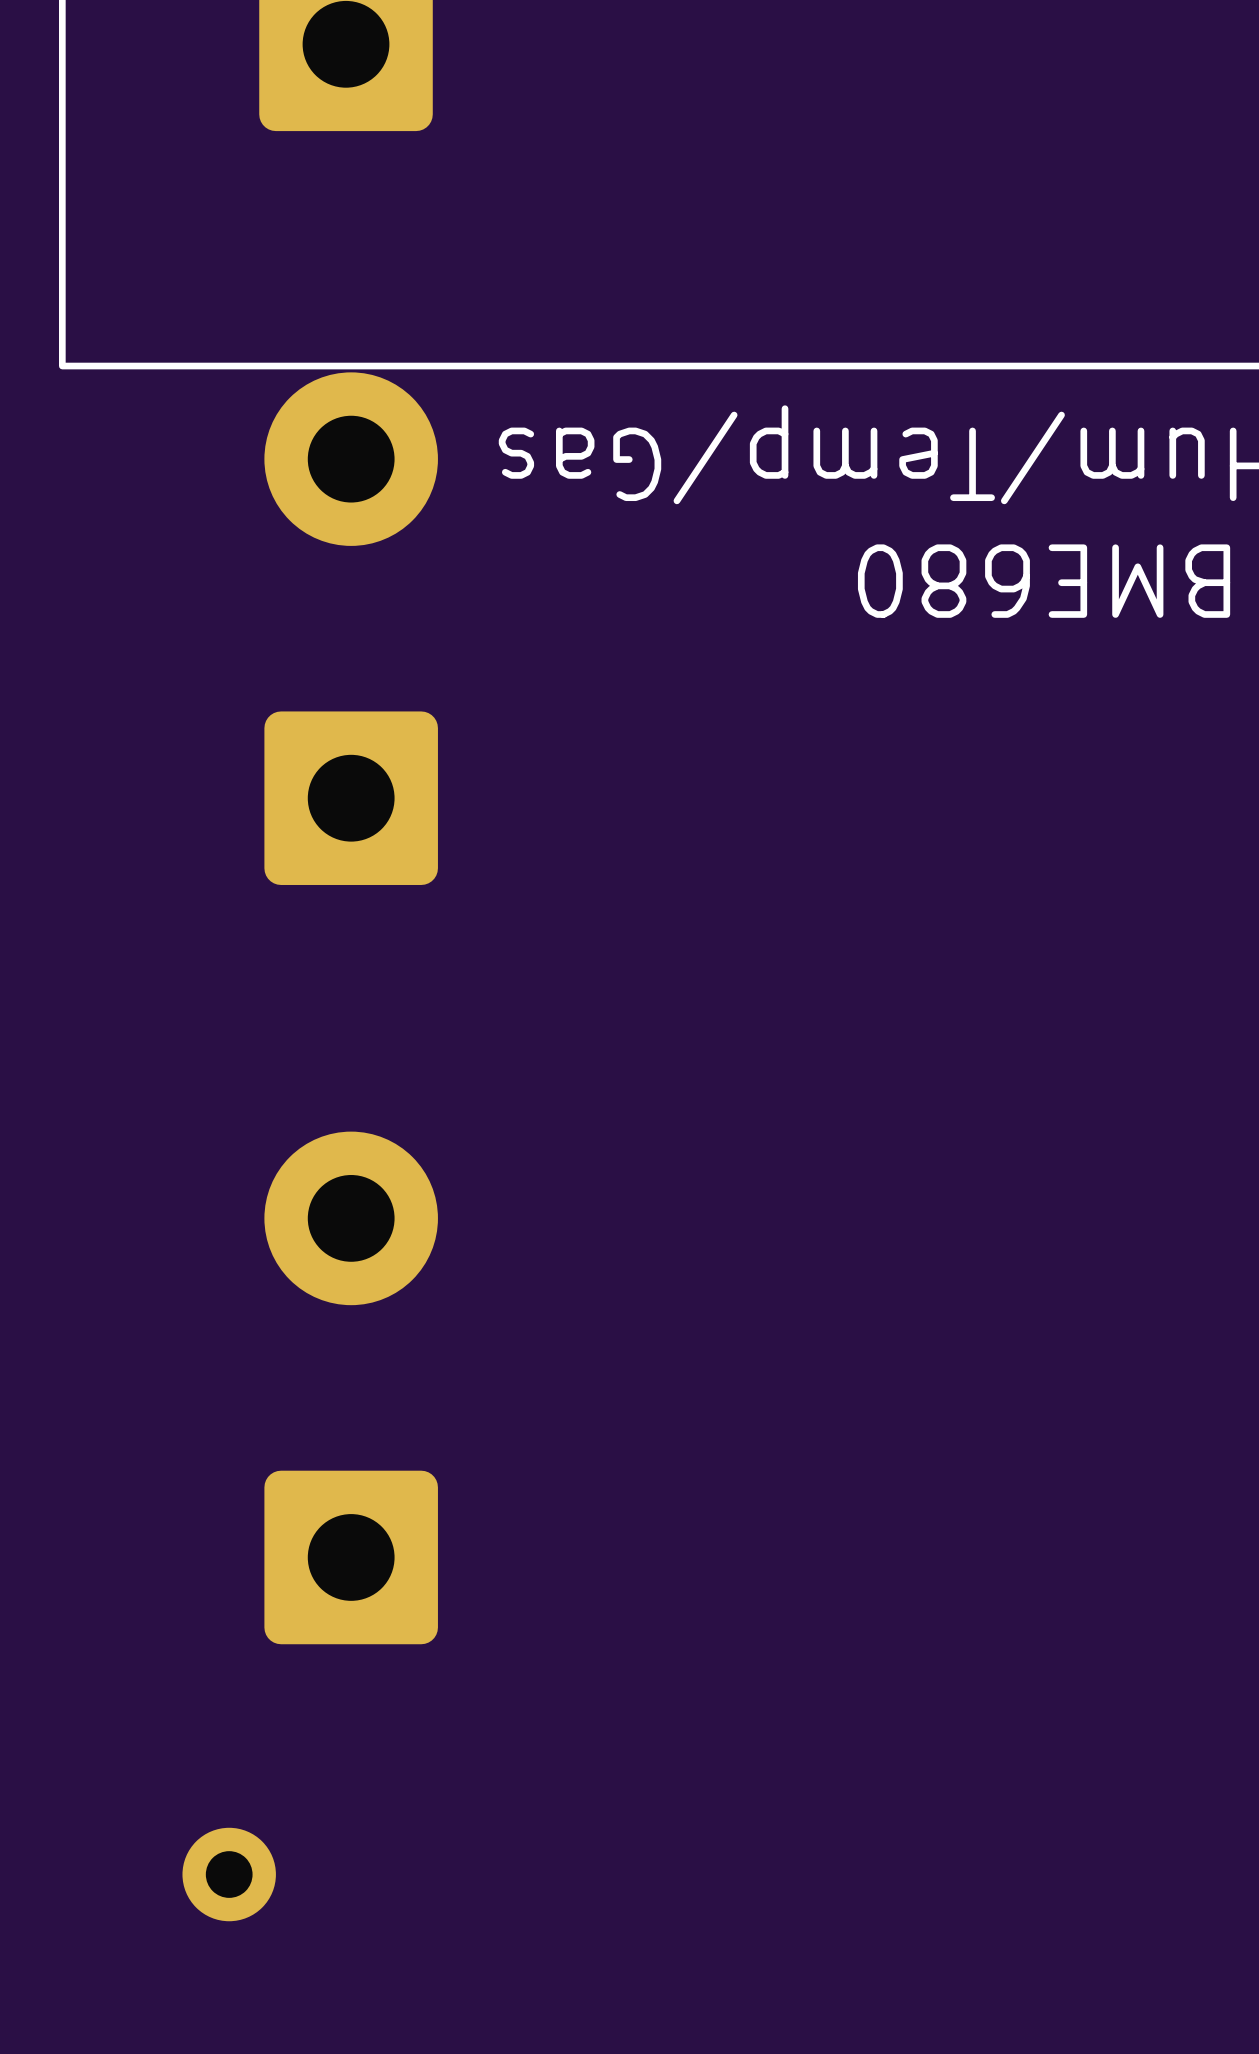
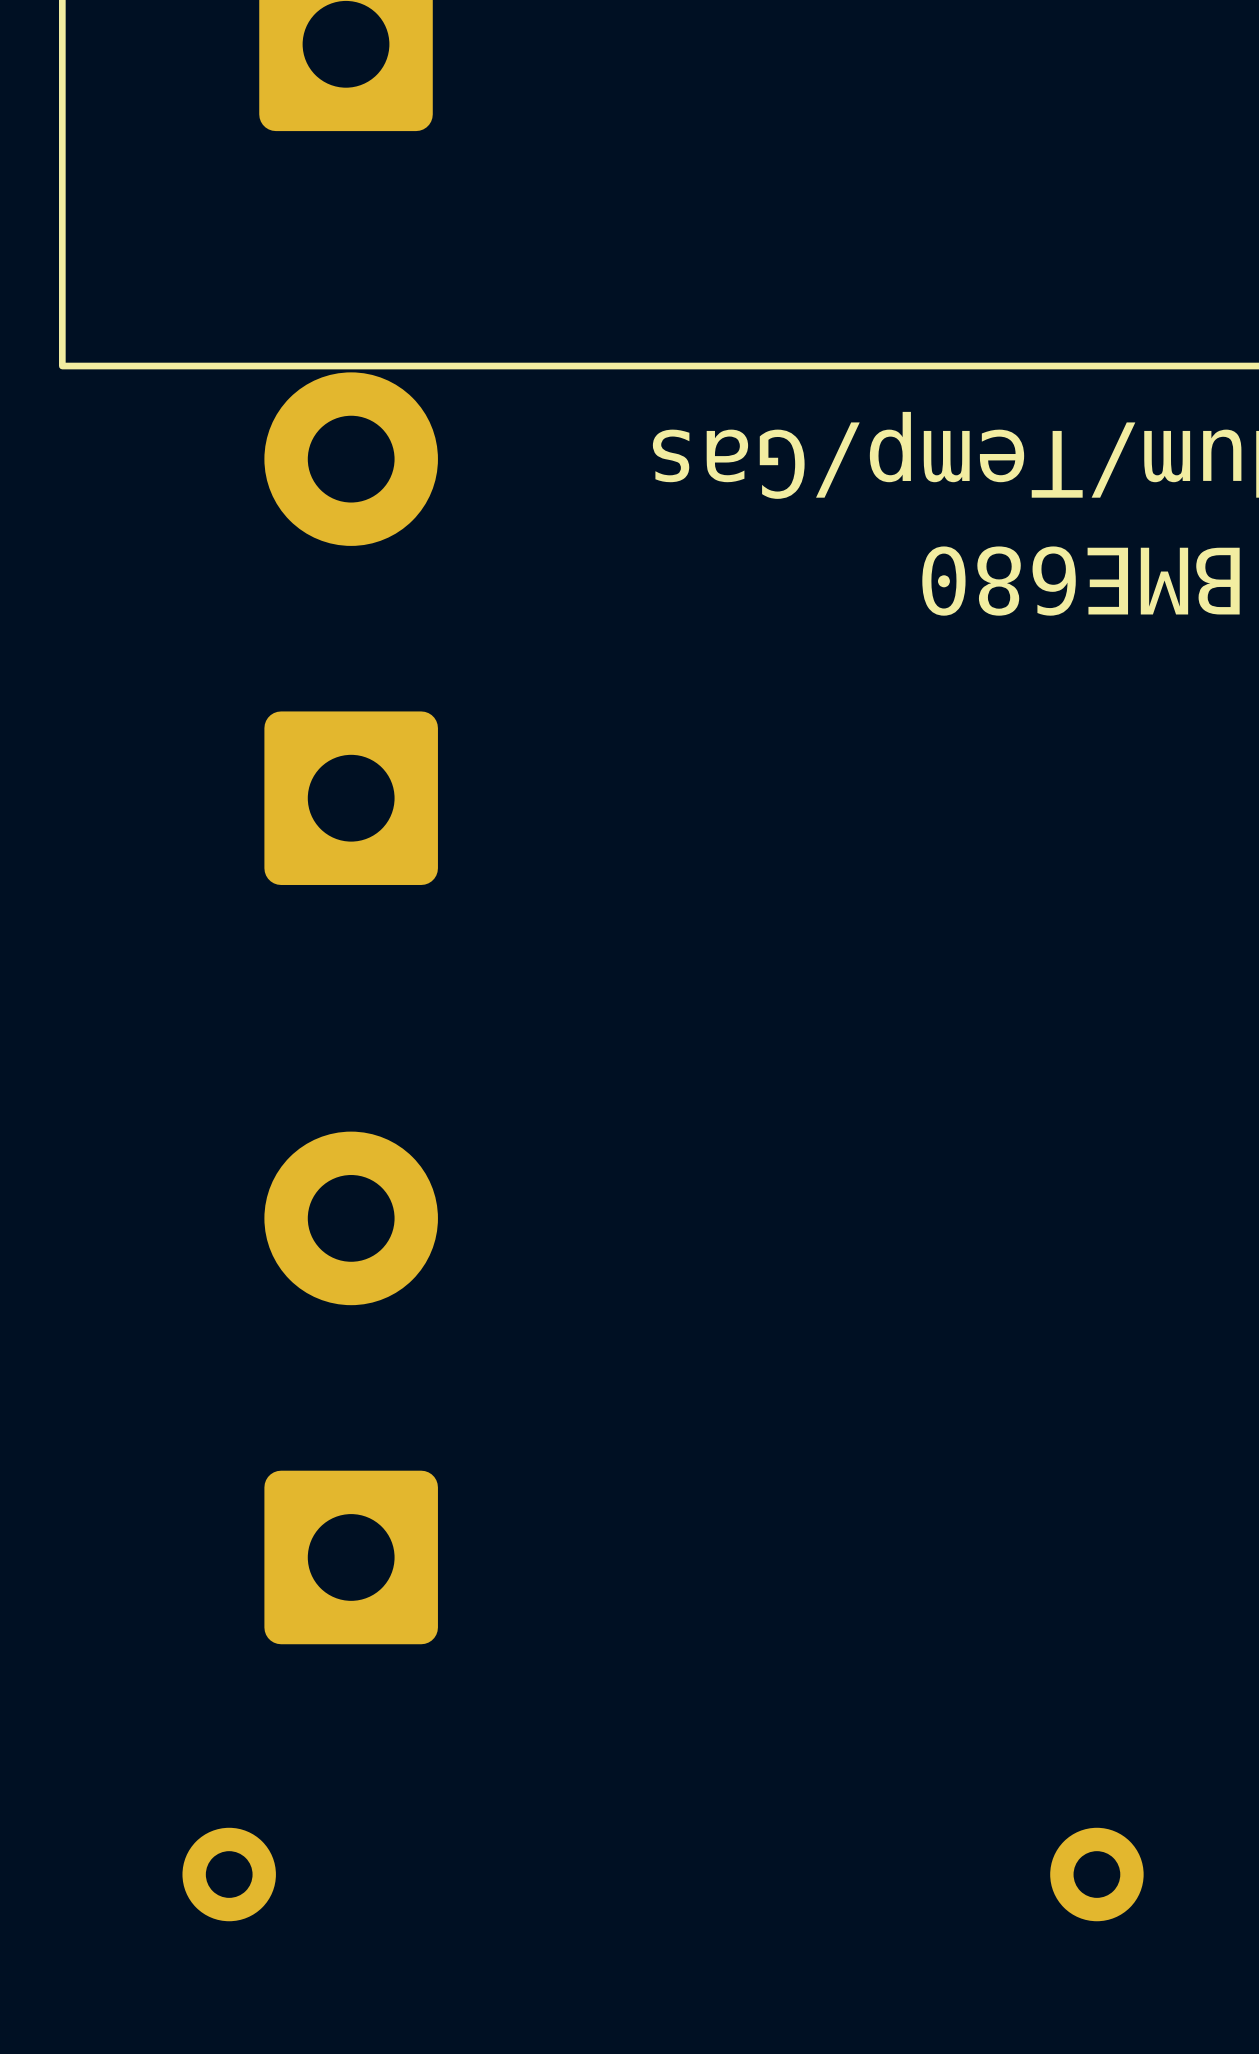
part: none -> (1096, 1874)

